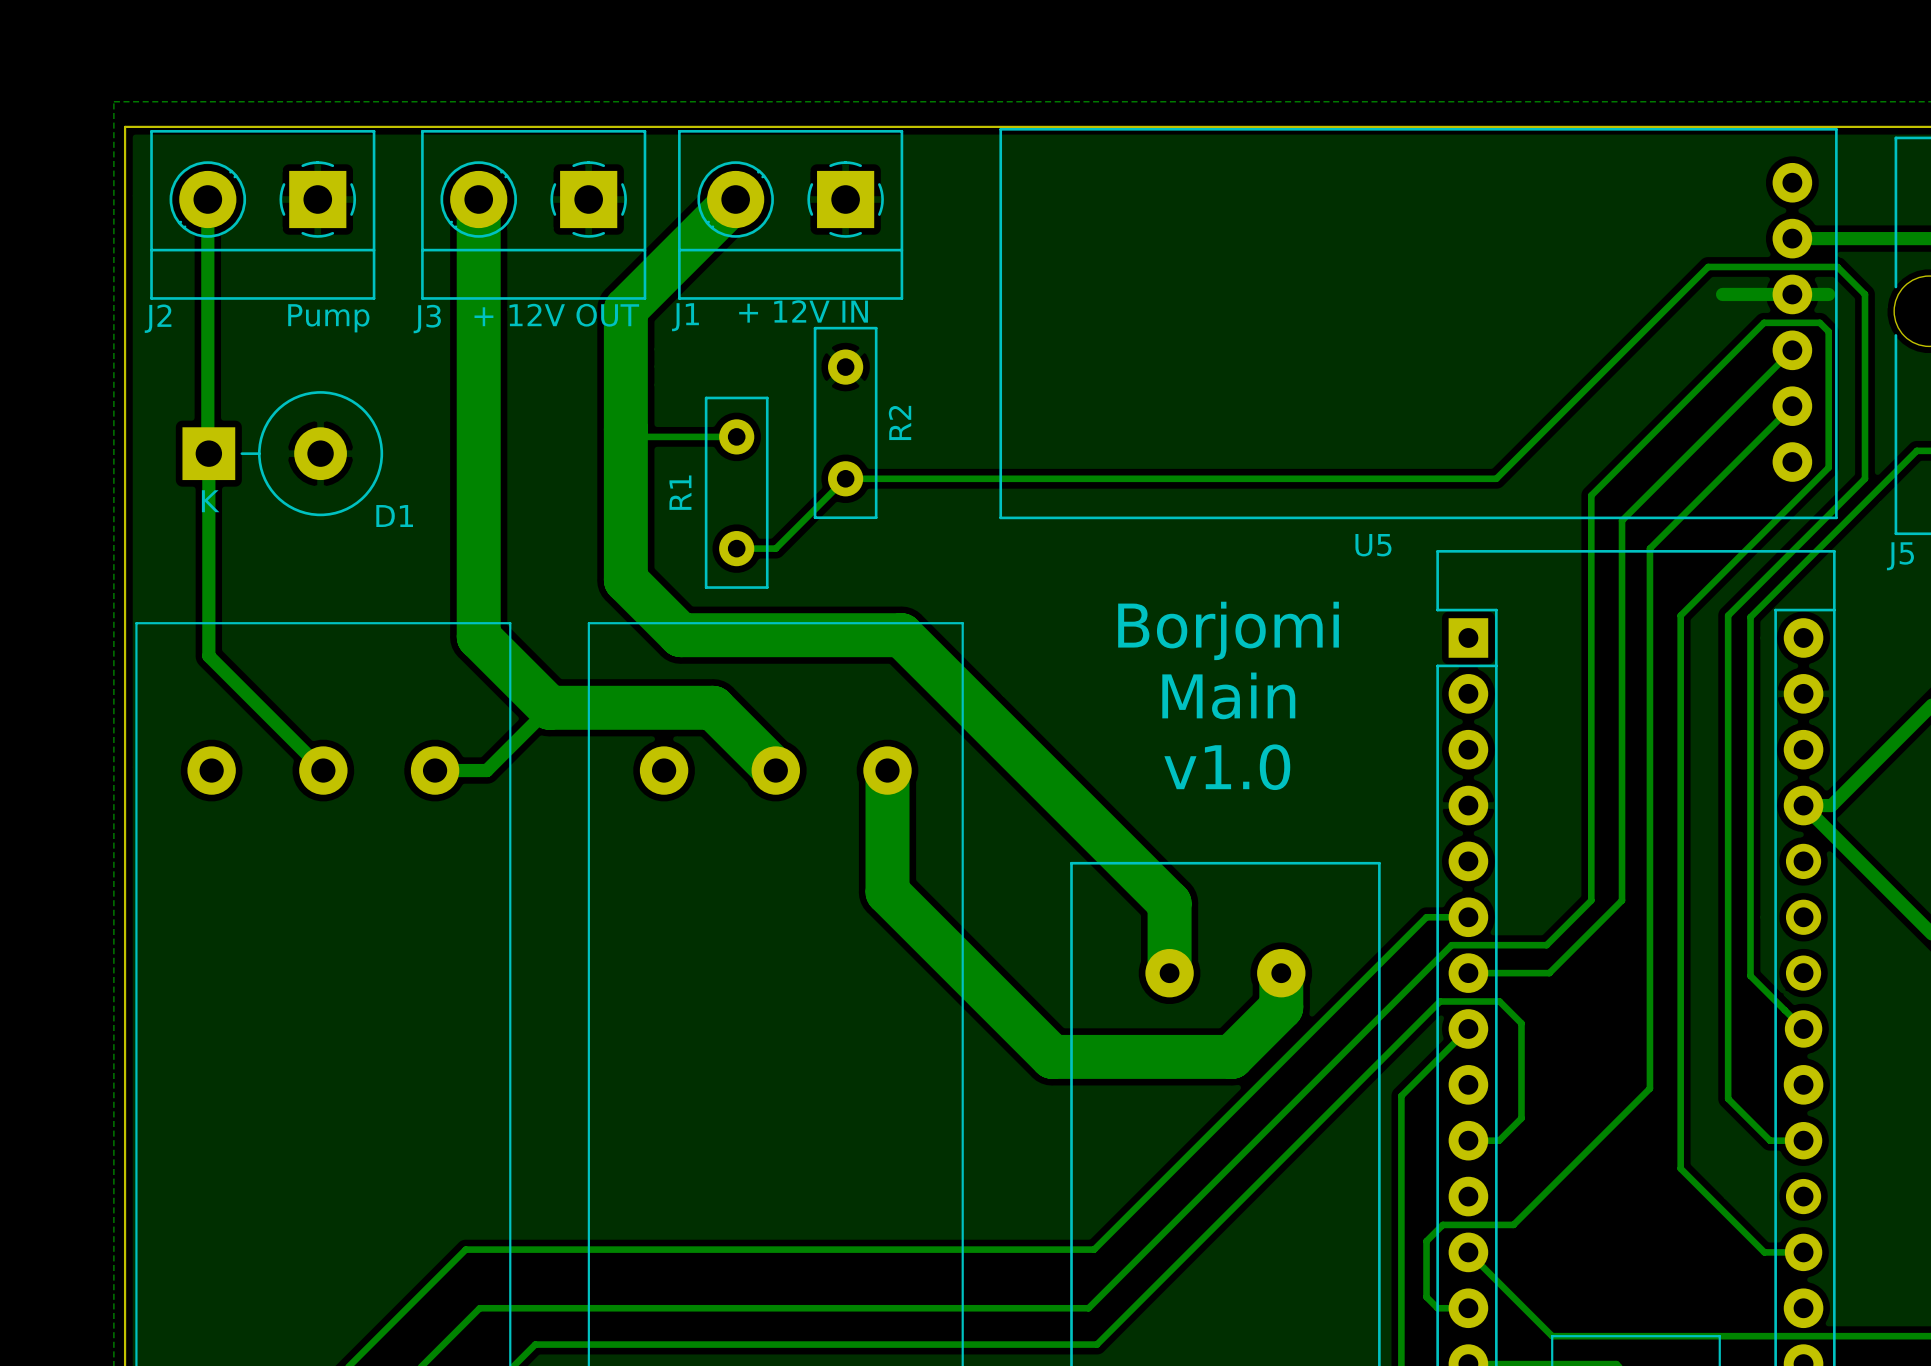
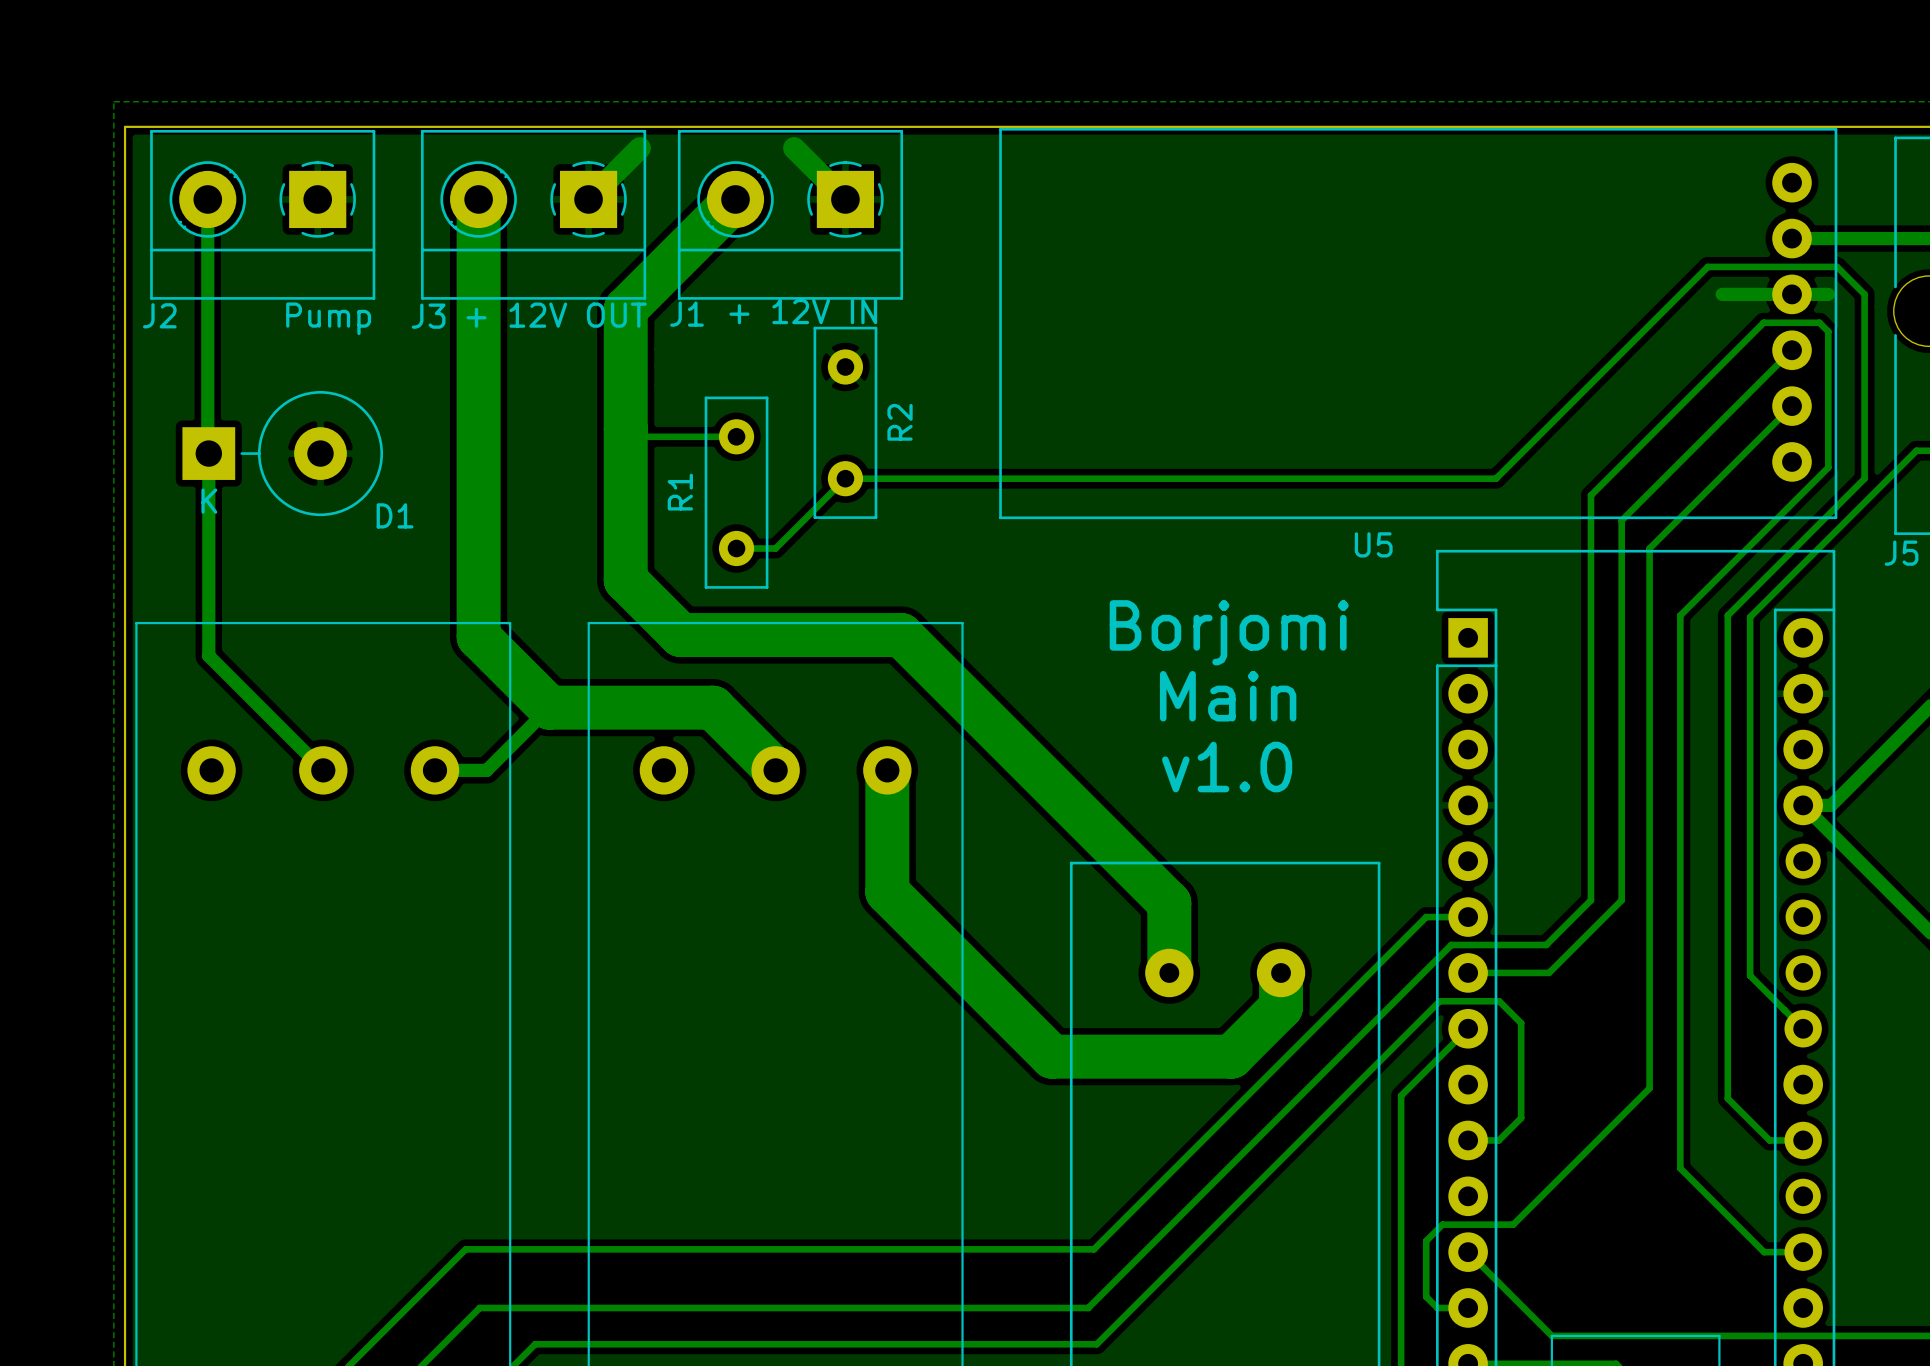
bottom track: none -> (639, 148) (588, 199)
bottom track: none -> (794, 148) (845, 199)

